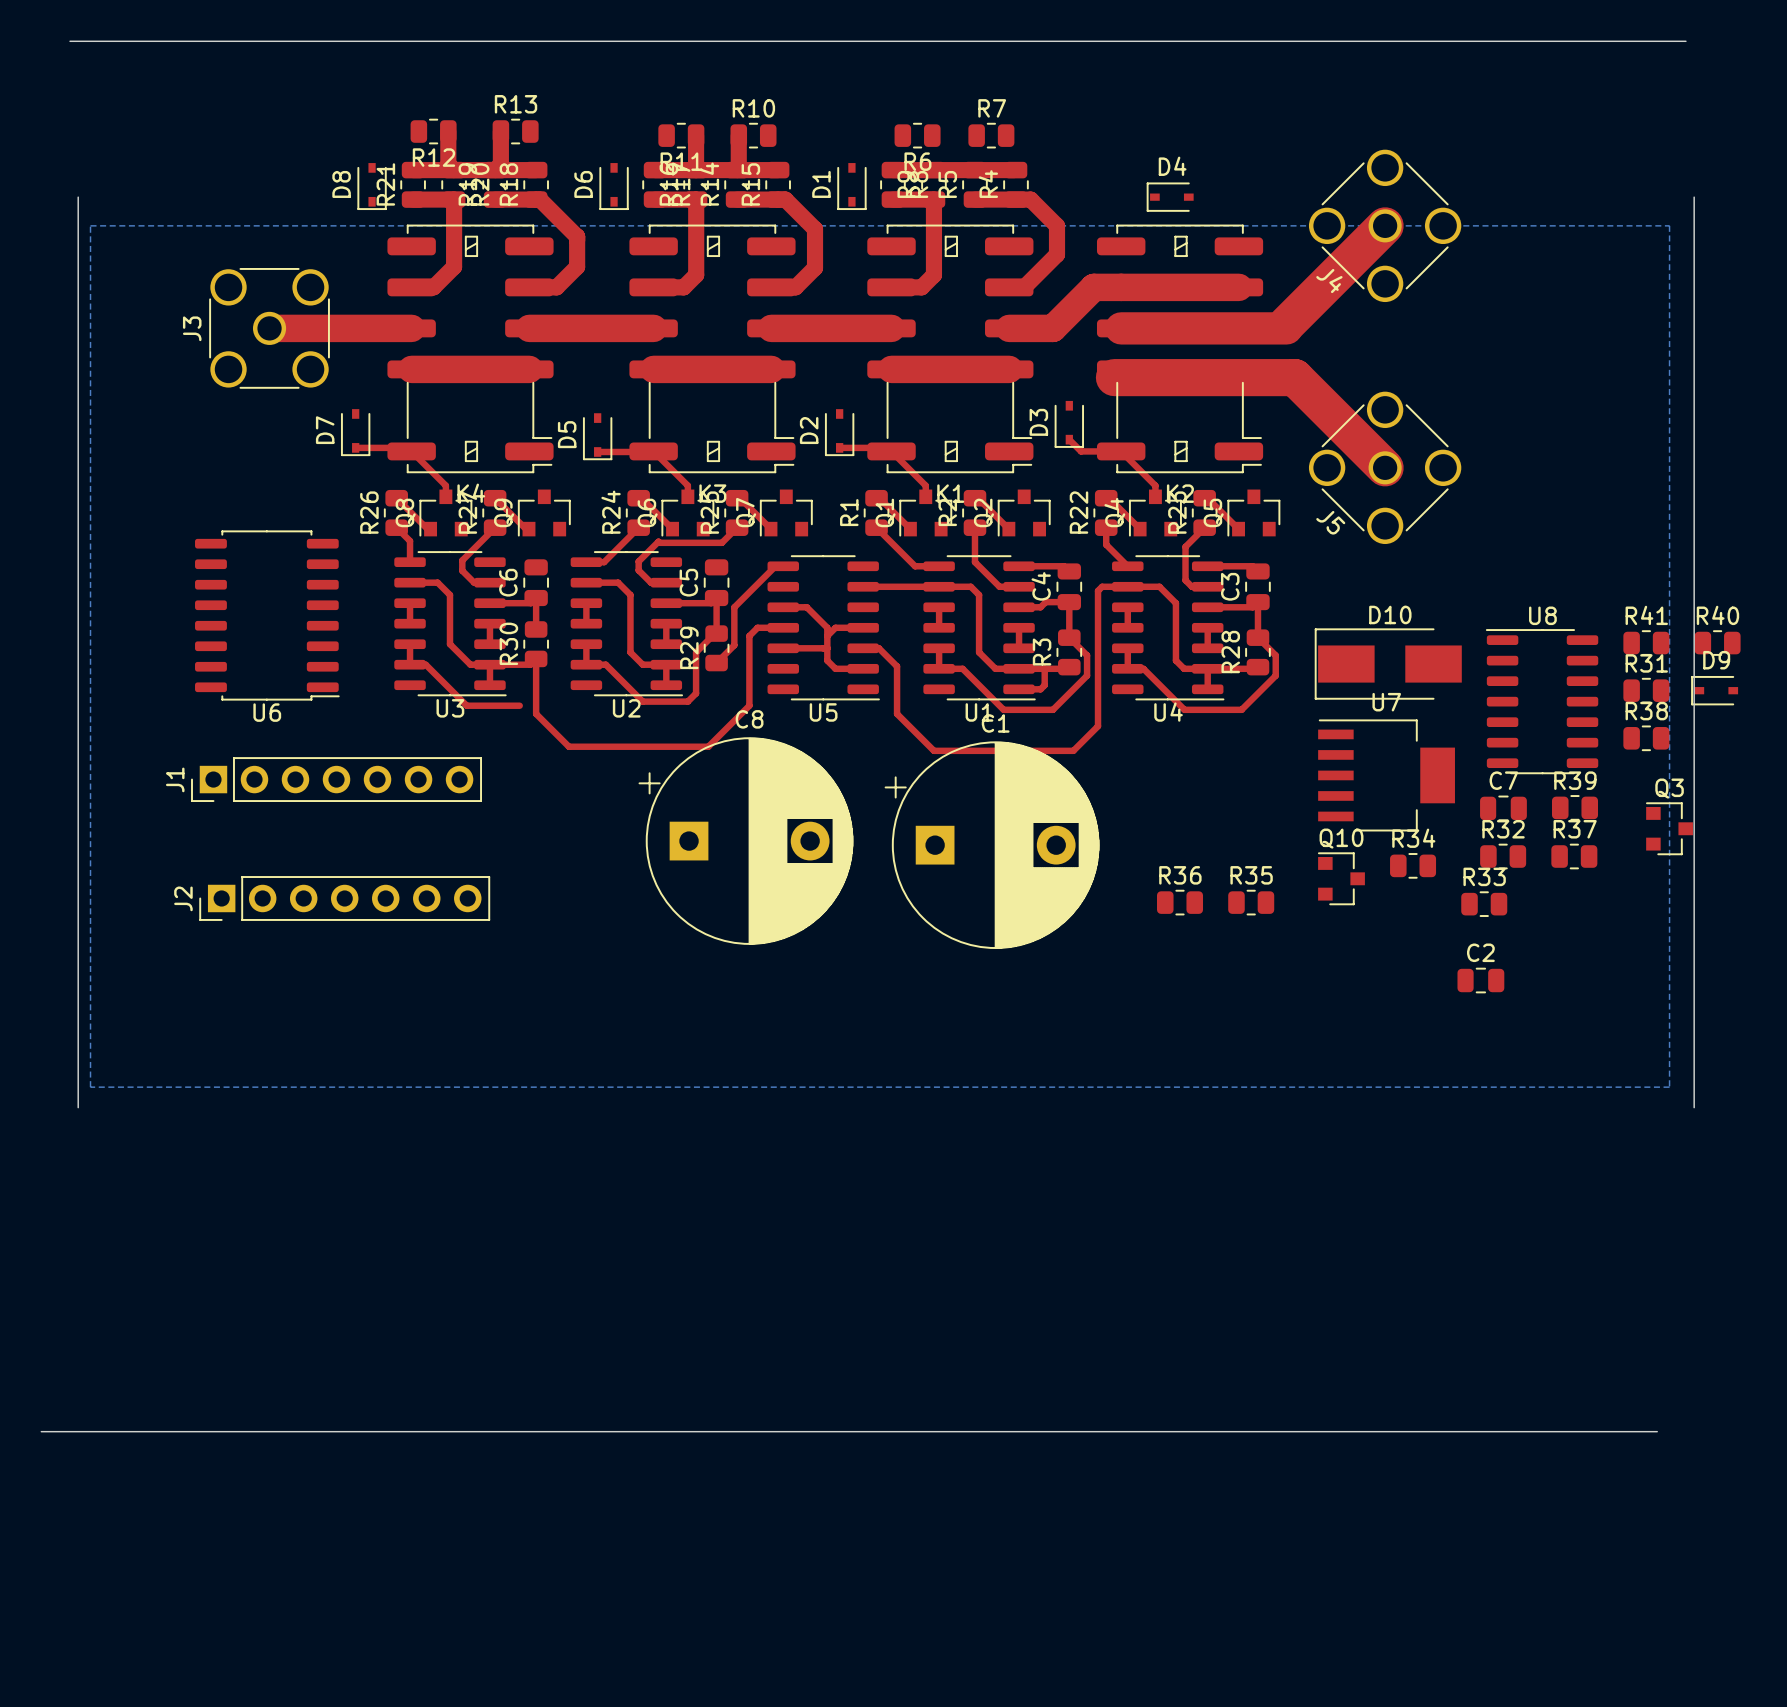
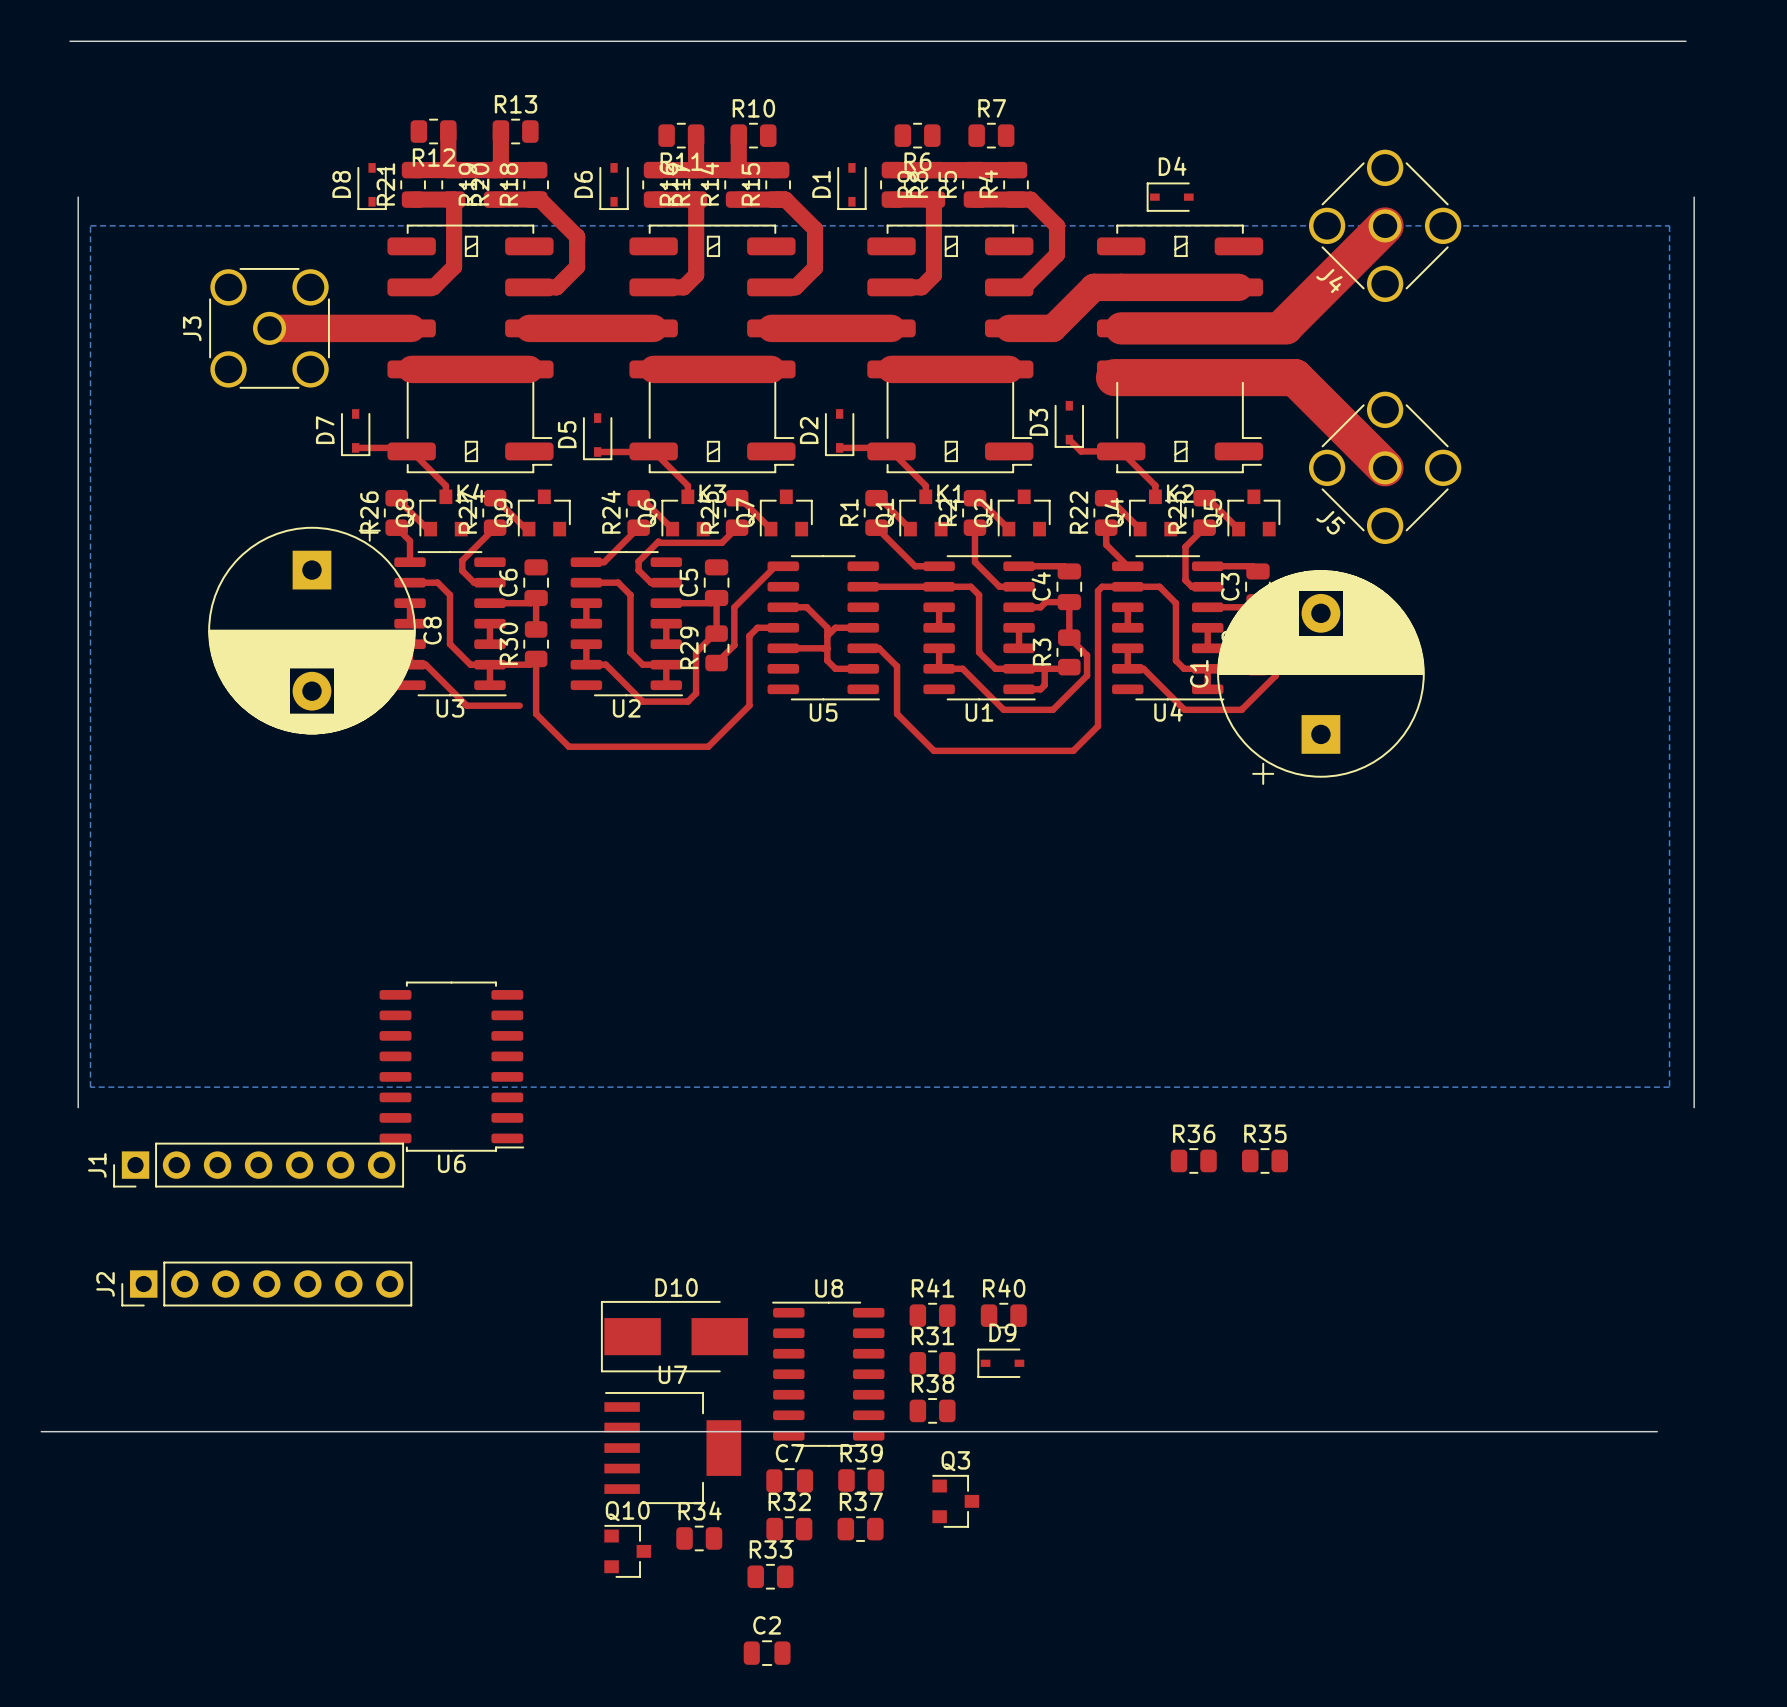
U6 position: (267, 615) -> (451, 1066)
R41 position: (1646, 643) -> (932, 1315)
R40 position: (1717, 643) -> (1003, 1315)
D10 position: (1388, 664) -> (674, 1336)
R31 position: (1646, 690) -> (932, 1363)
D9 position: (1714, 690) -> (1000, 1363)
U8 position: (1542, 701) -> (828, 1374)
R38 position: (1646, 738) -> (932, 1410)
U7 position: (1386, 775) -> (672, 1448)
J1 position: (336, 779) -> (258, 1165)
R39 position: (1575, 807) -> (861, 1480)
C7 position: (1503, 808) -> (789, 1480)
Q3 position: (1669, 828) -> (955, 1501)
C8 rotation: 0° (745, 841) -> 90° clockwise (311, 627)
C8 position: (745, 841) -> (311, 627)
C1 rotation: 0° (992, 845) -> 90° counterclockwise (1320, 677)
C1 position: (992, 845) -> (1320, 677)
R32 position: (1503, 856) -> (789, 1529)
R37 position: (1574, 856) -> (860, 1529)
R34 position: (1413, 865) -> (699, 1538)
Q10 position: (1341, 878) -> (627, 1551)
J2 position: (344, 898) -> (266, 1284)
R36 position: (1180, 902) -> (1193, 1160)
R35 position: (1251, 902) -> (1265, 1160)
R33 position: (1484, 904) -> (770, 1576)
C2 position: (1480, 980) -> (767, 1653)

